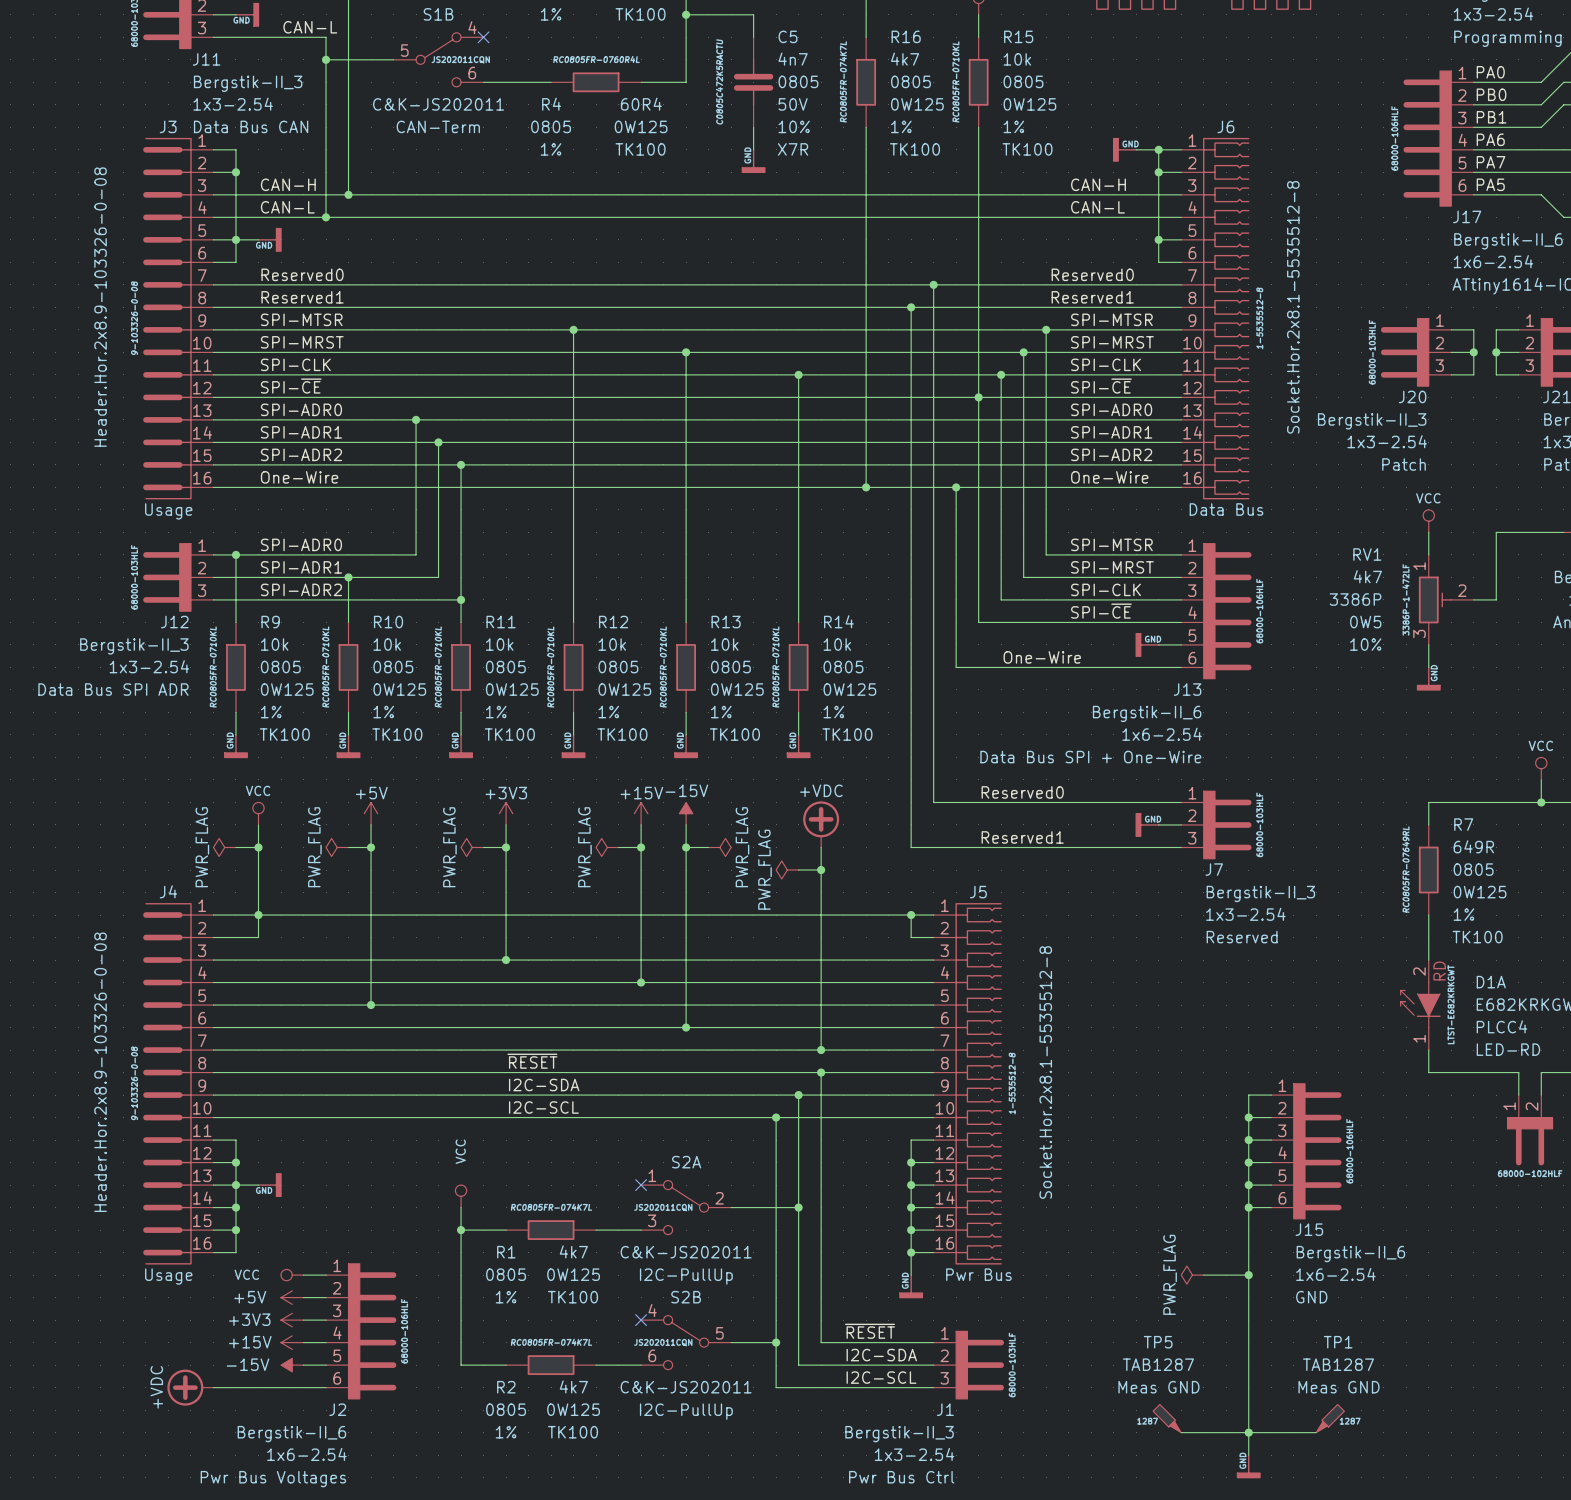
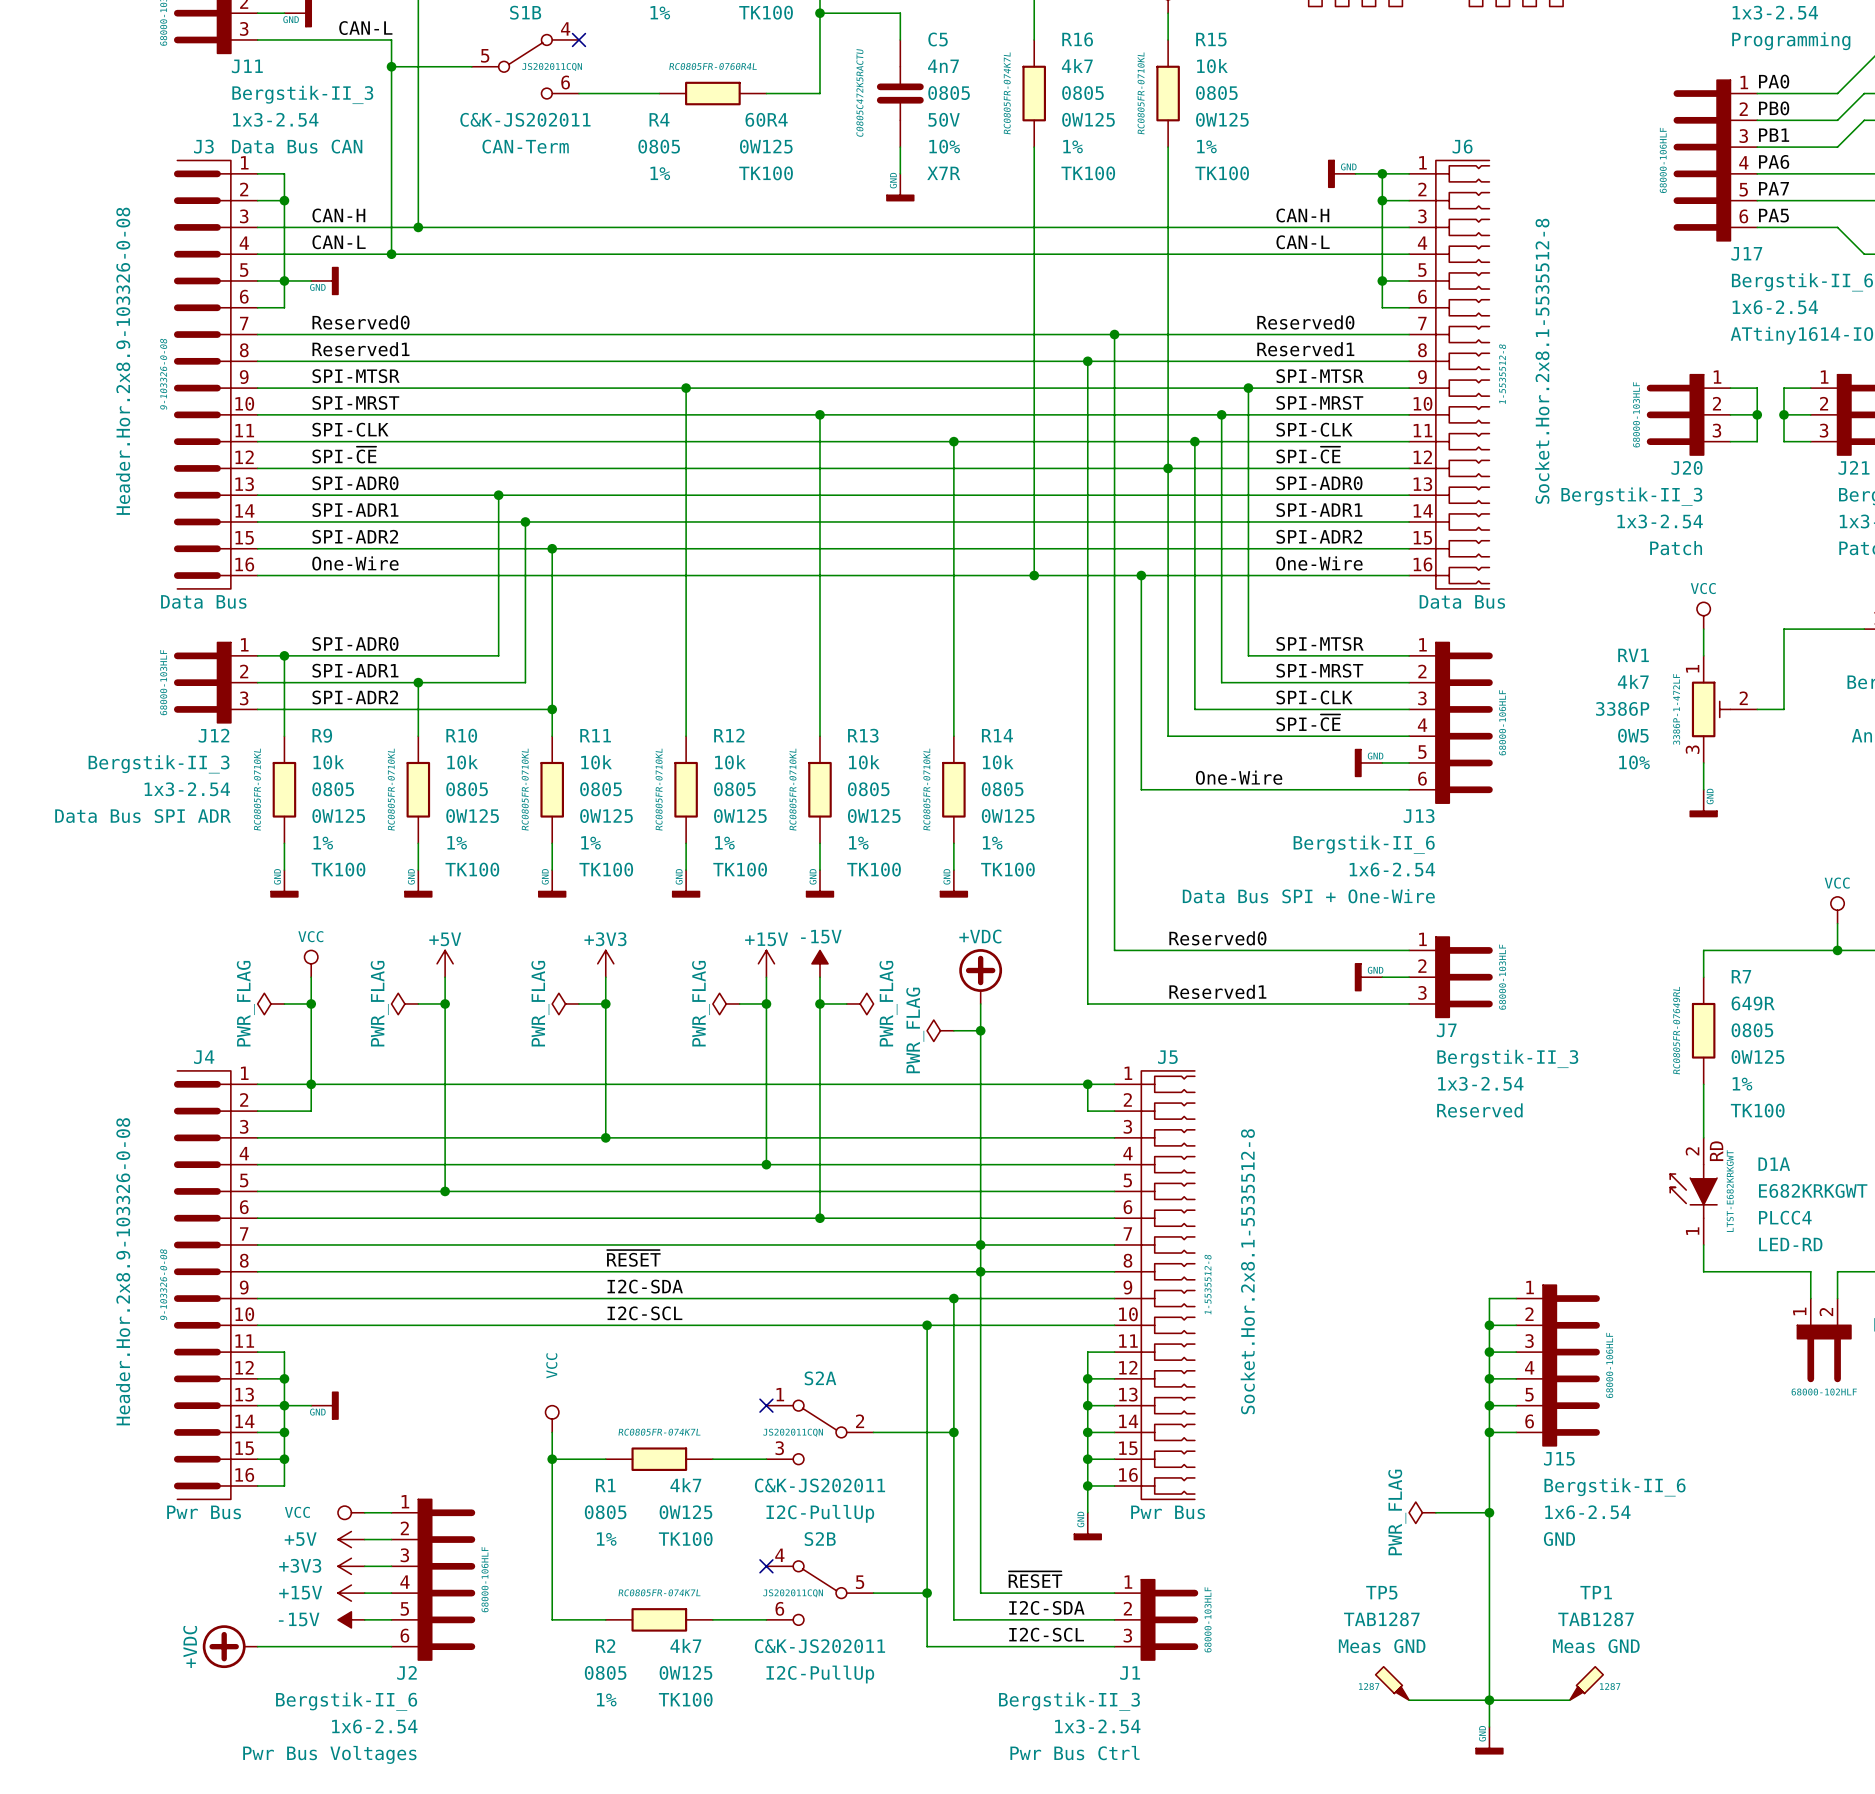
J3 text: Usage (168, 511) -> Data Bus (203, 601)
wire: none -> (980, 1244) (980, 1271)
J4 text: Usage (168, 1276) -> Pwr Bus (204, 1512)

